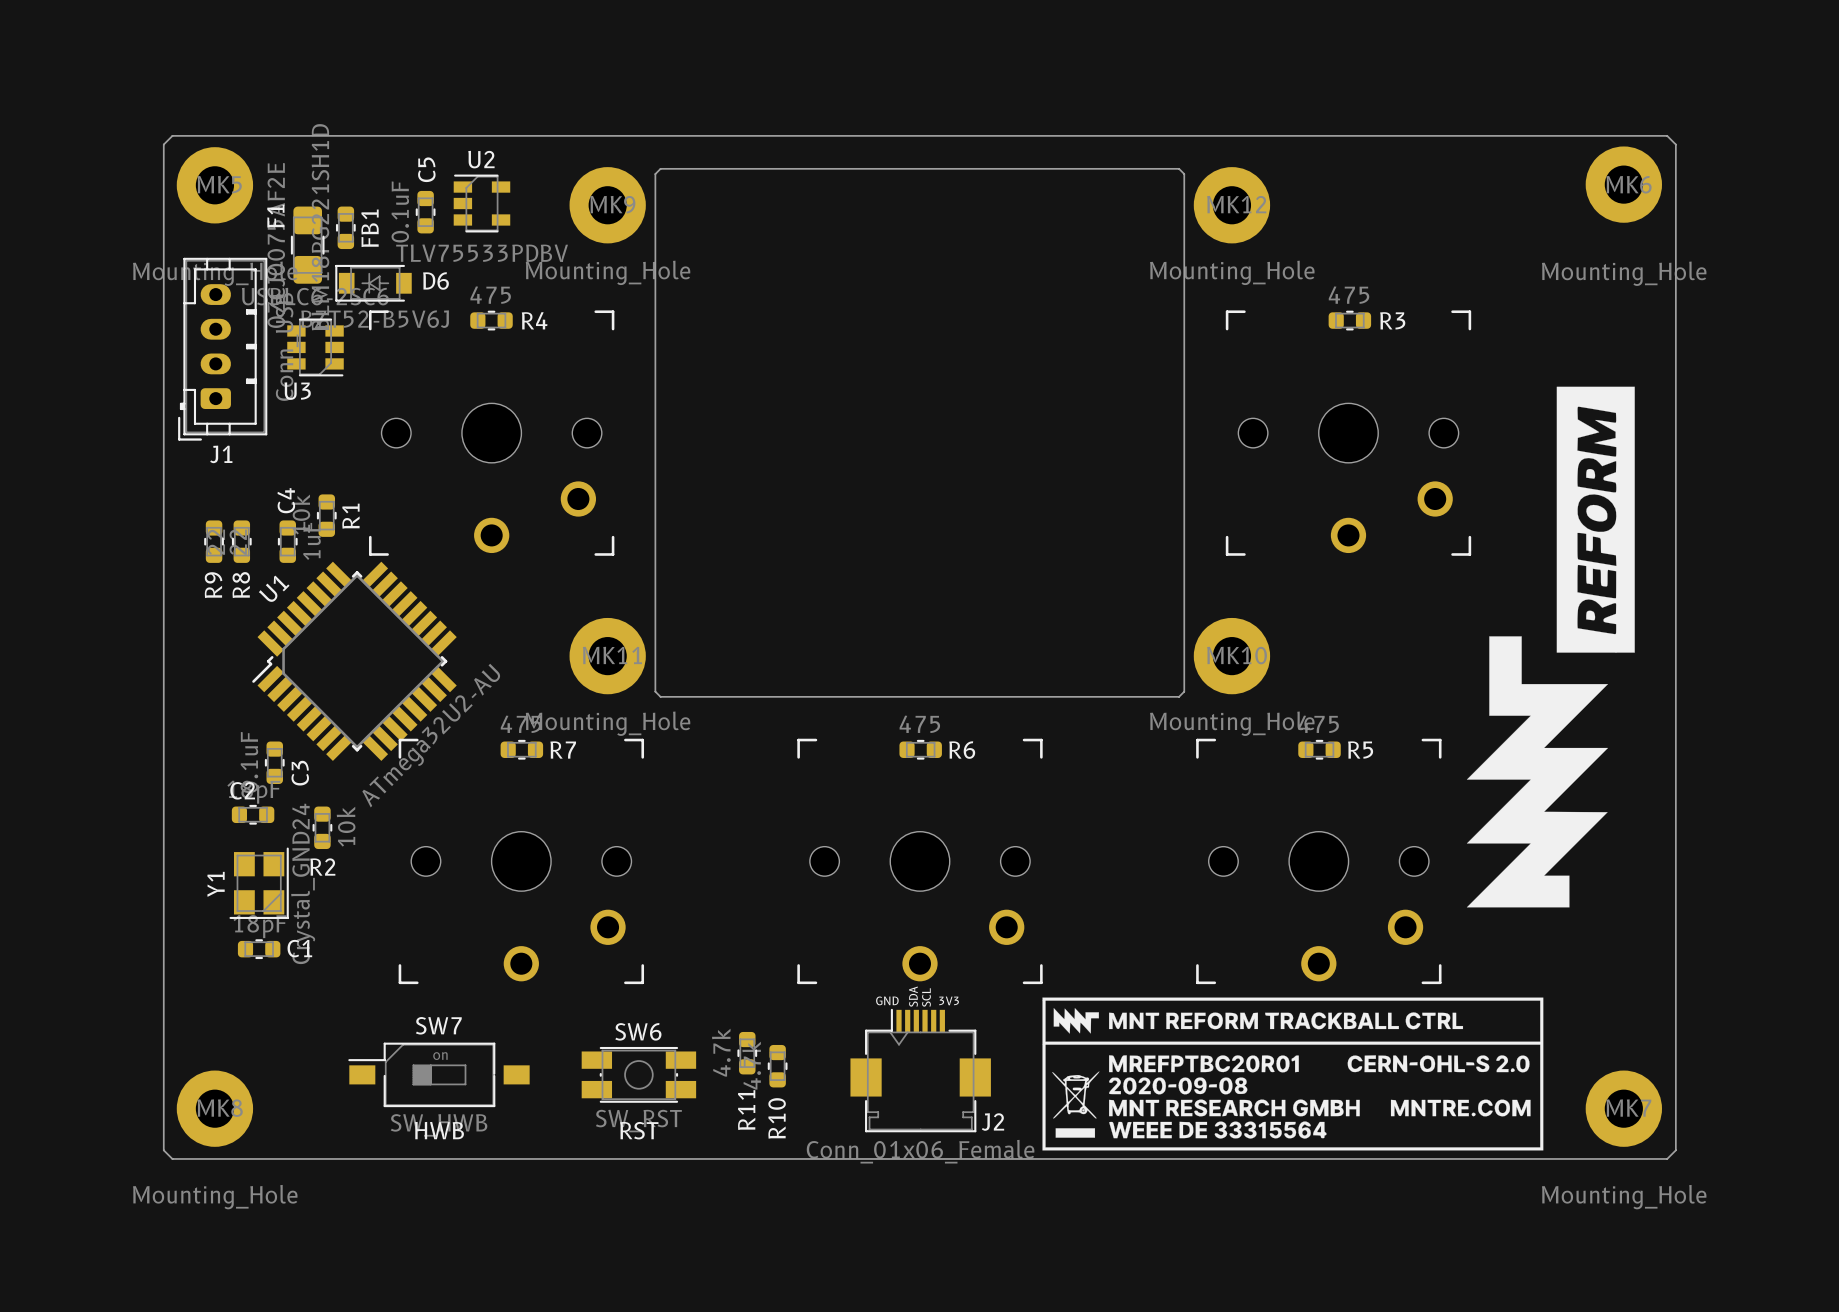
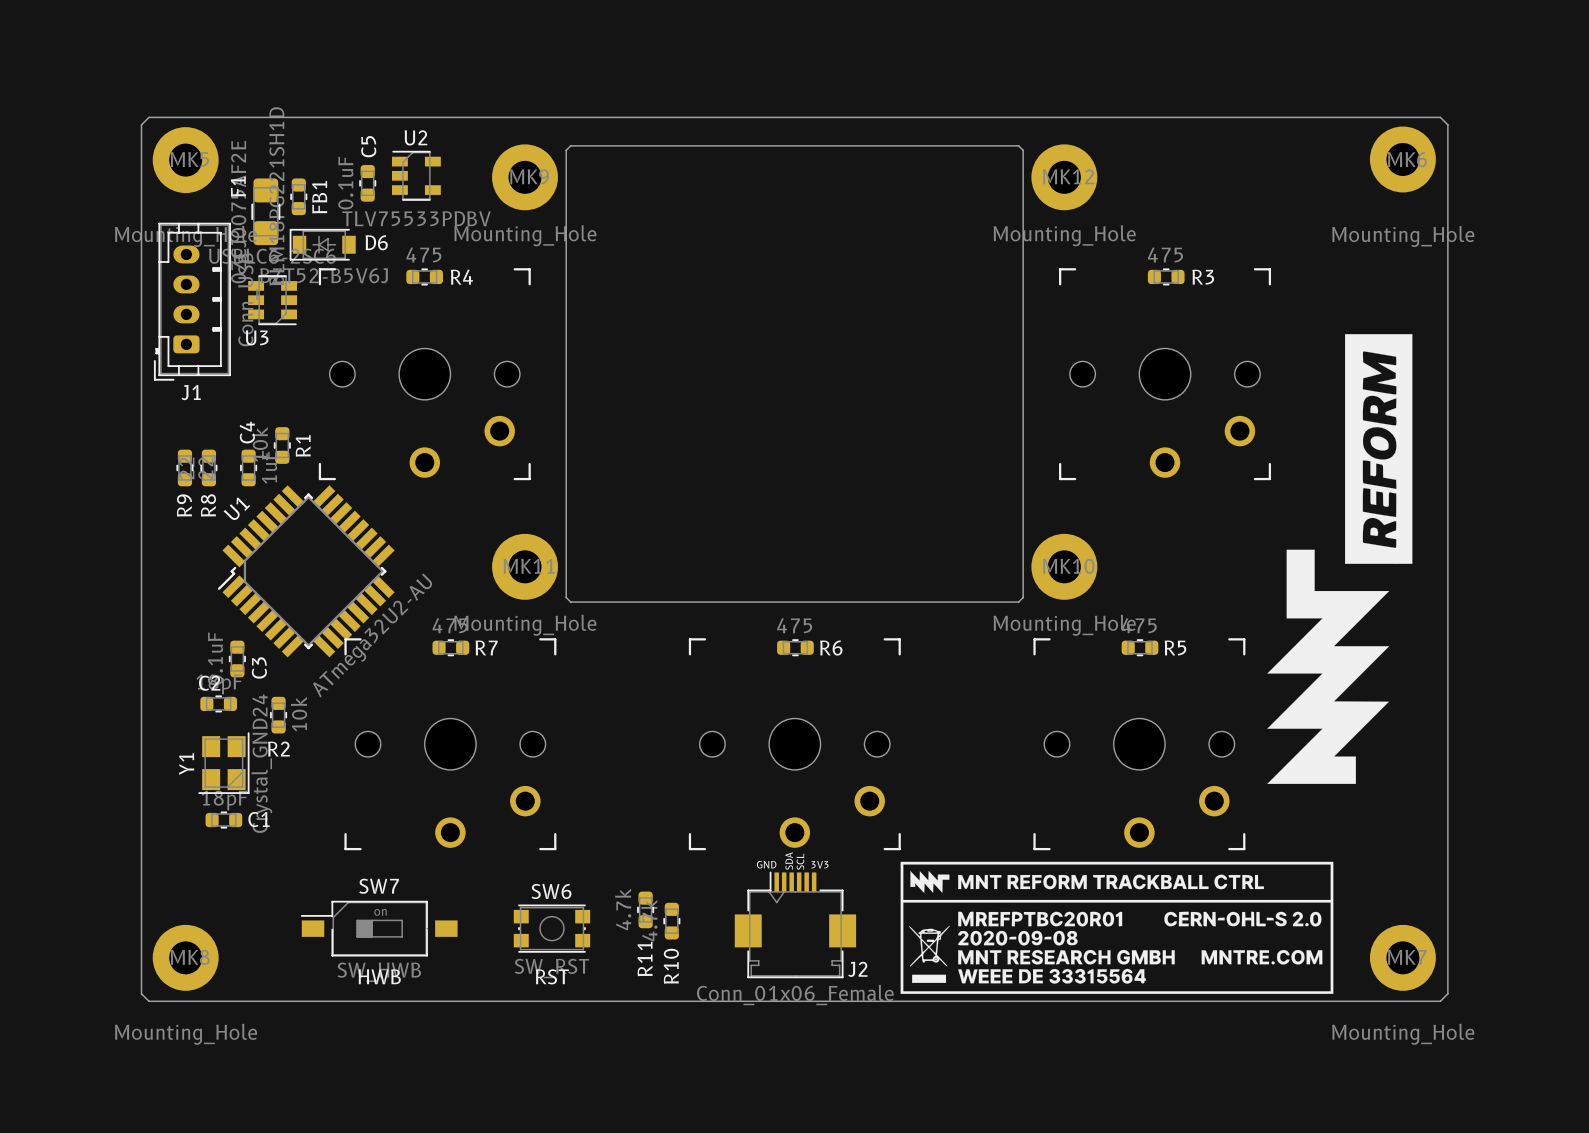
SW6 footprint: [581, 1046, 697, 1103] -> [513, 904, 591, 953]

